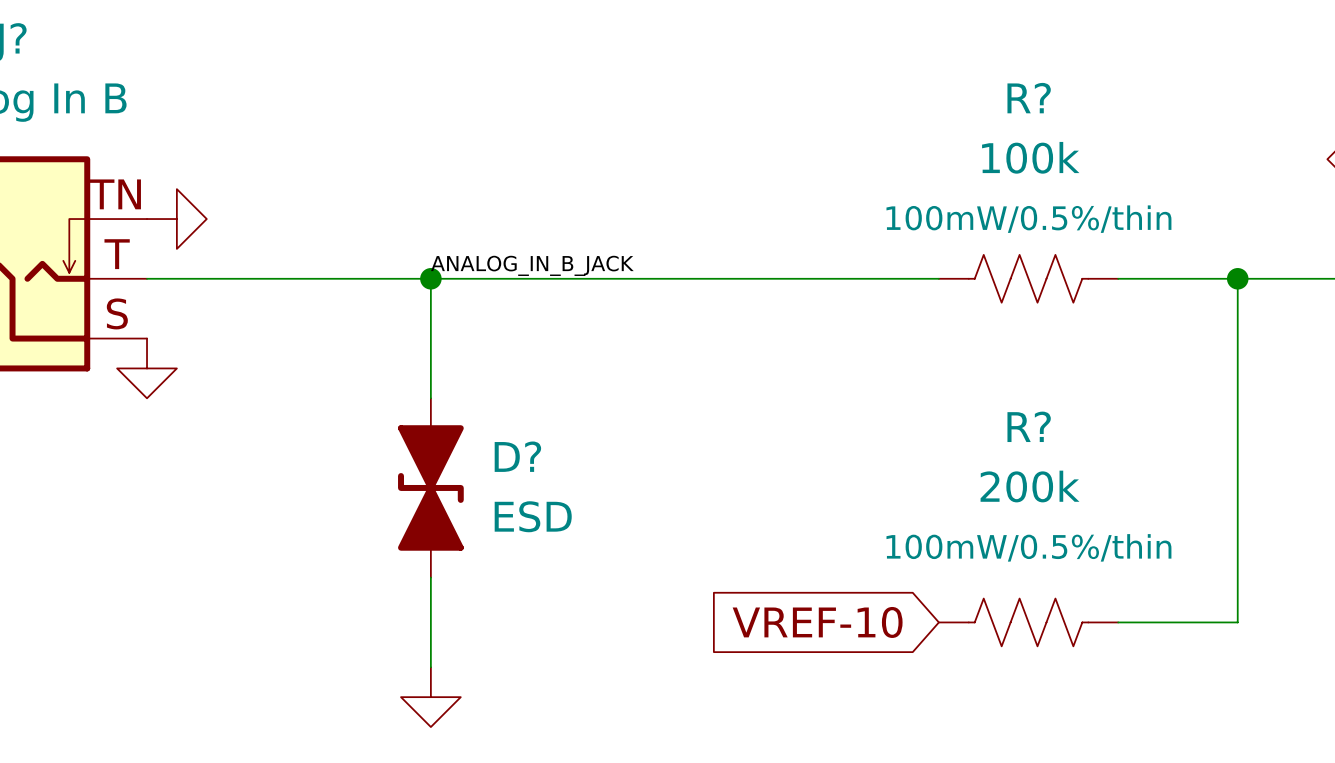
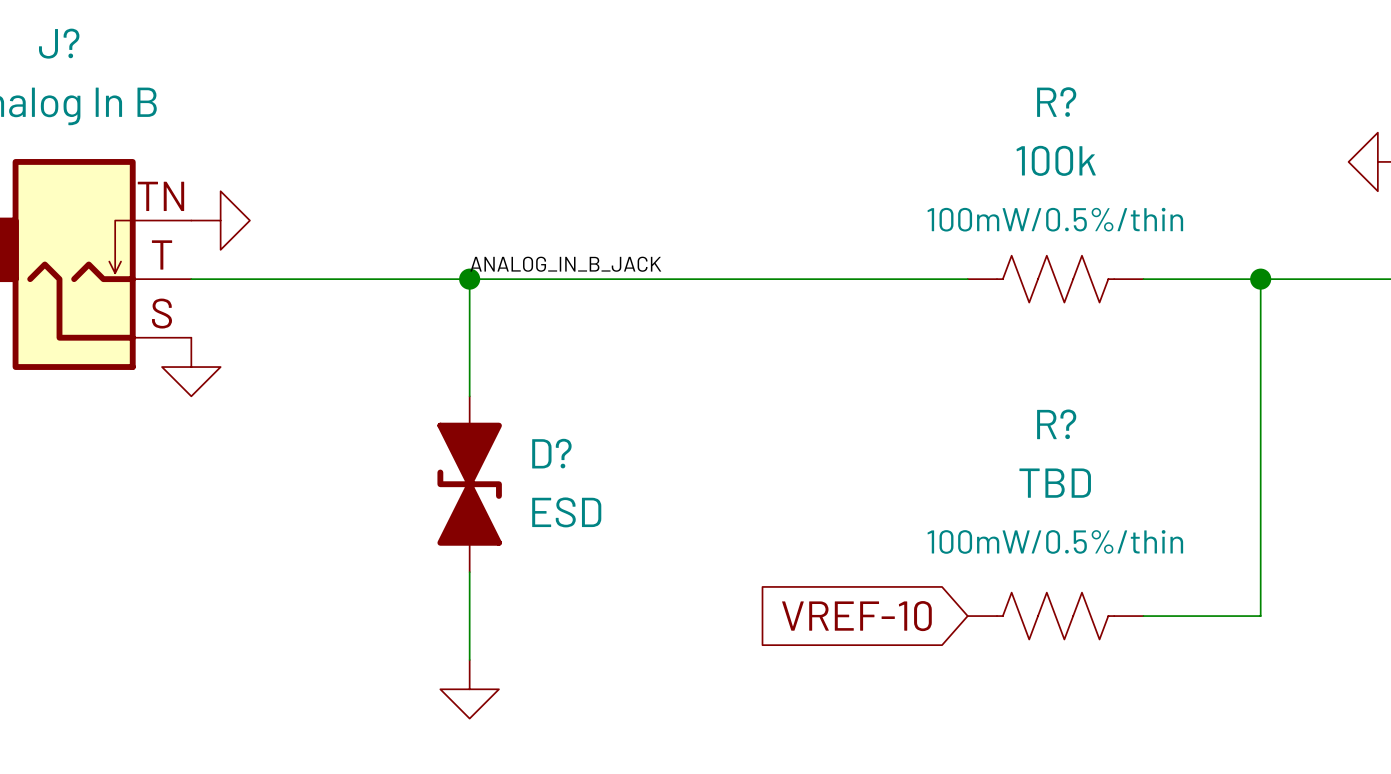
R? value: 200k (1029, 486) -> TBD (1055, 483)

